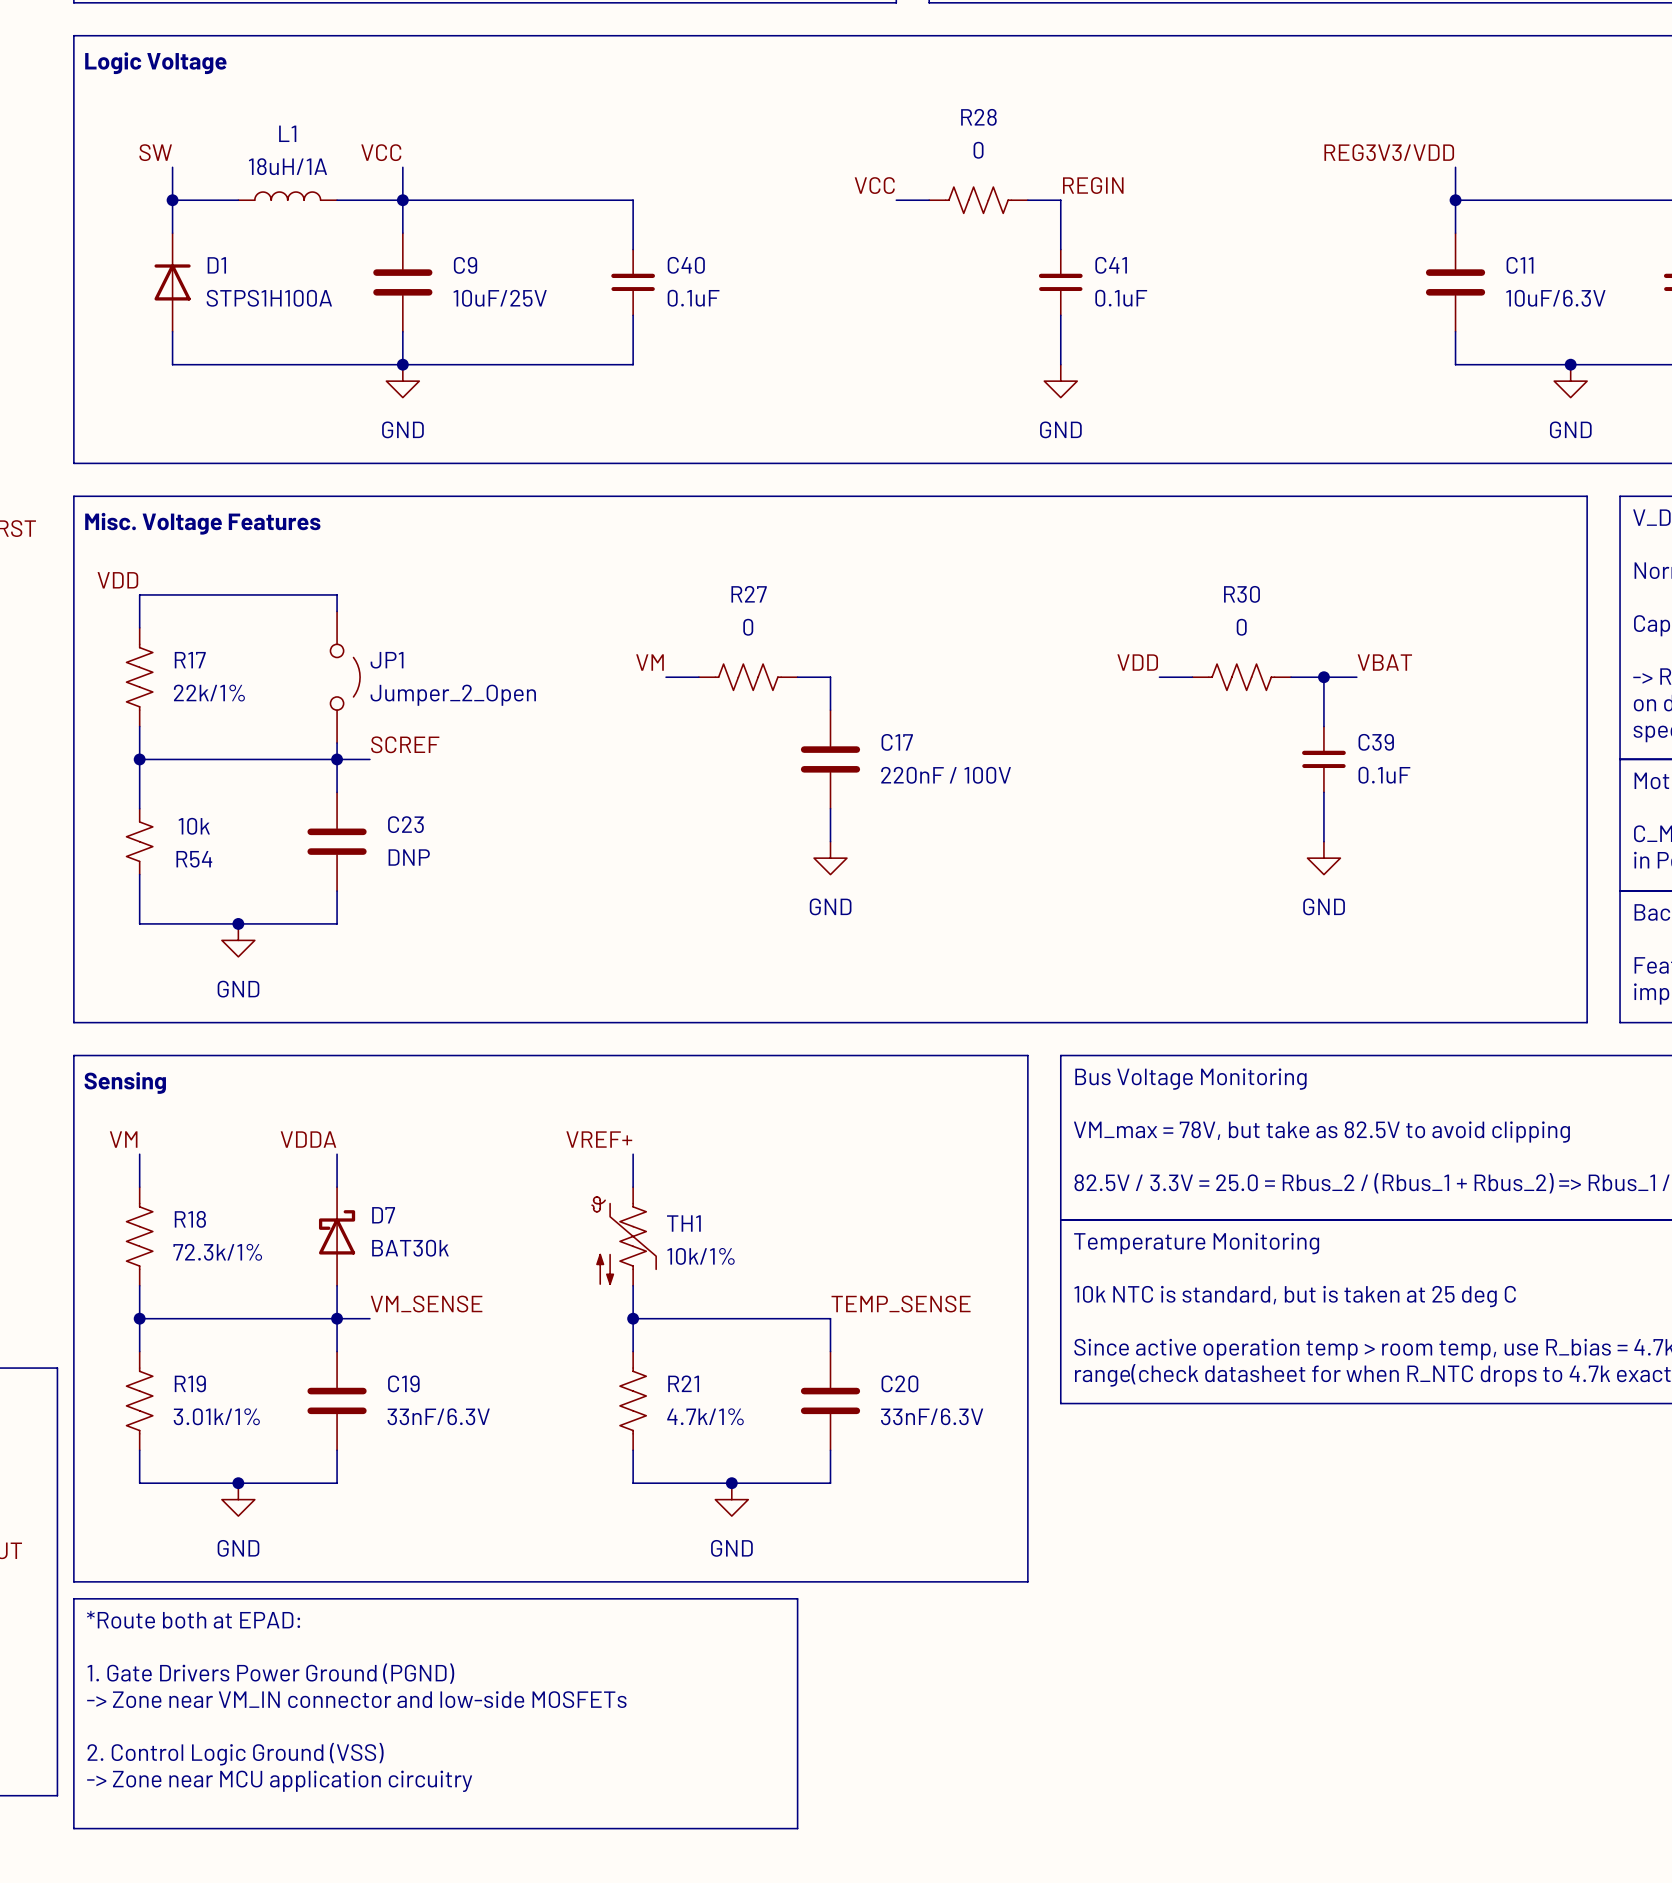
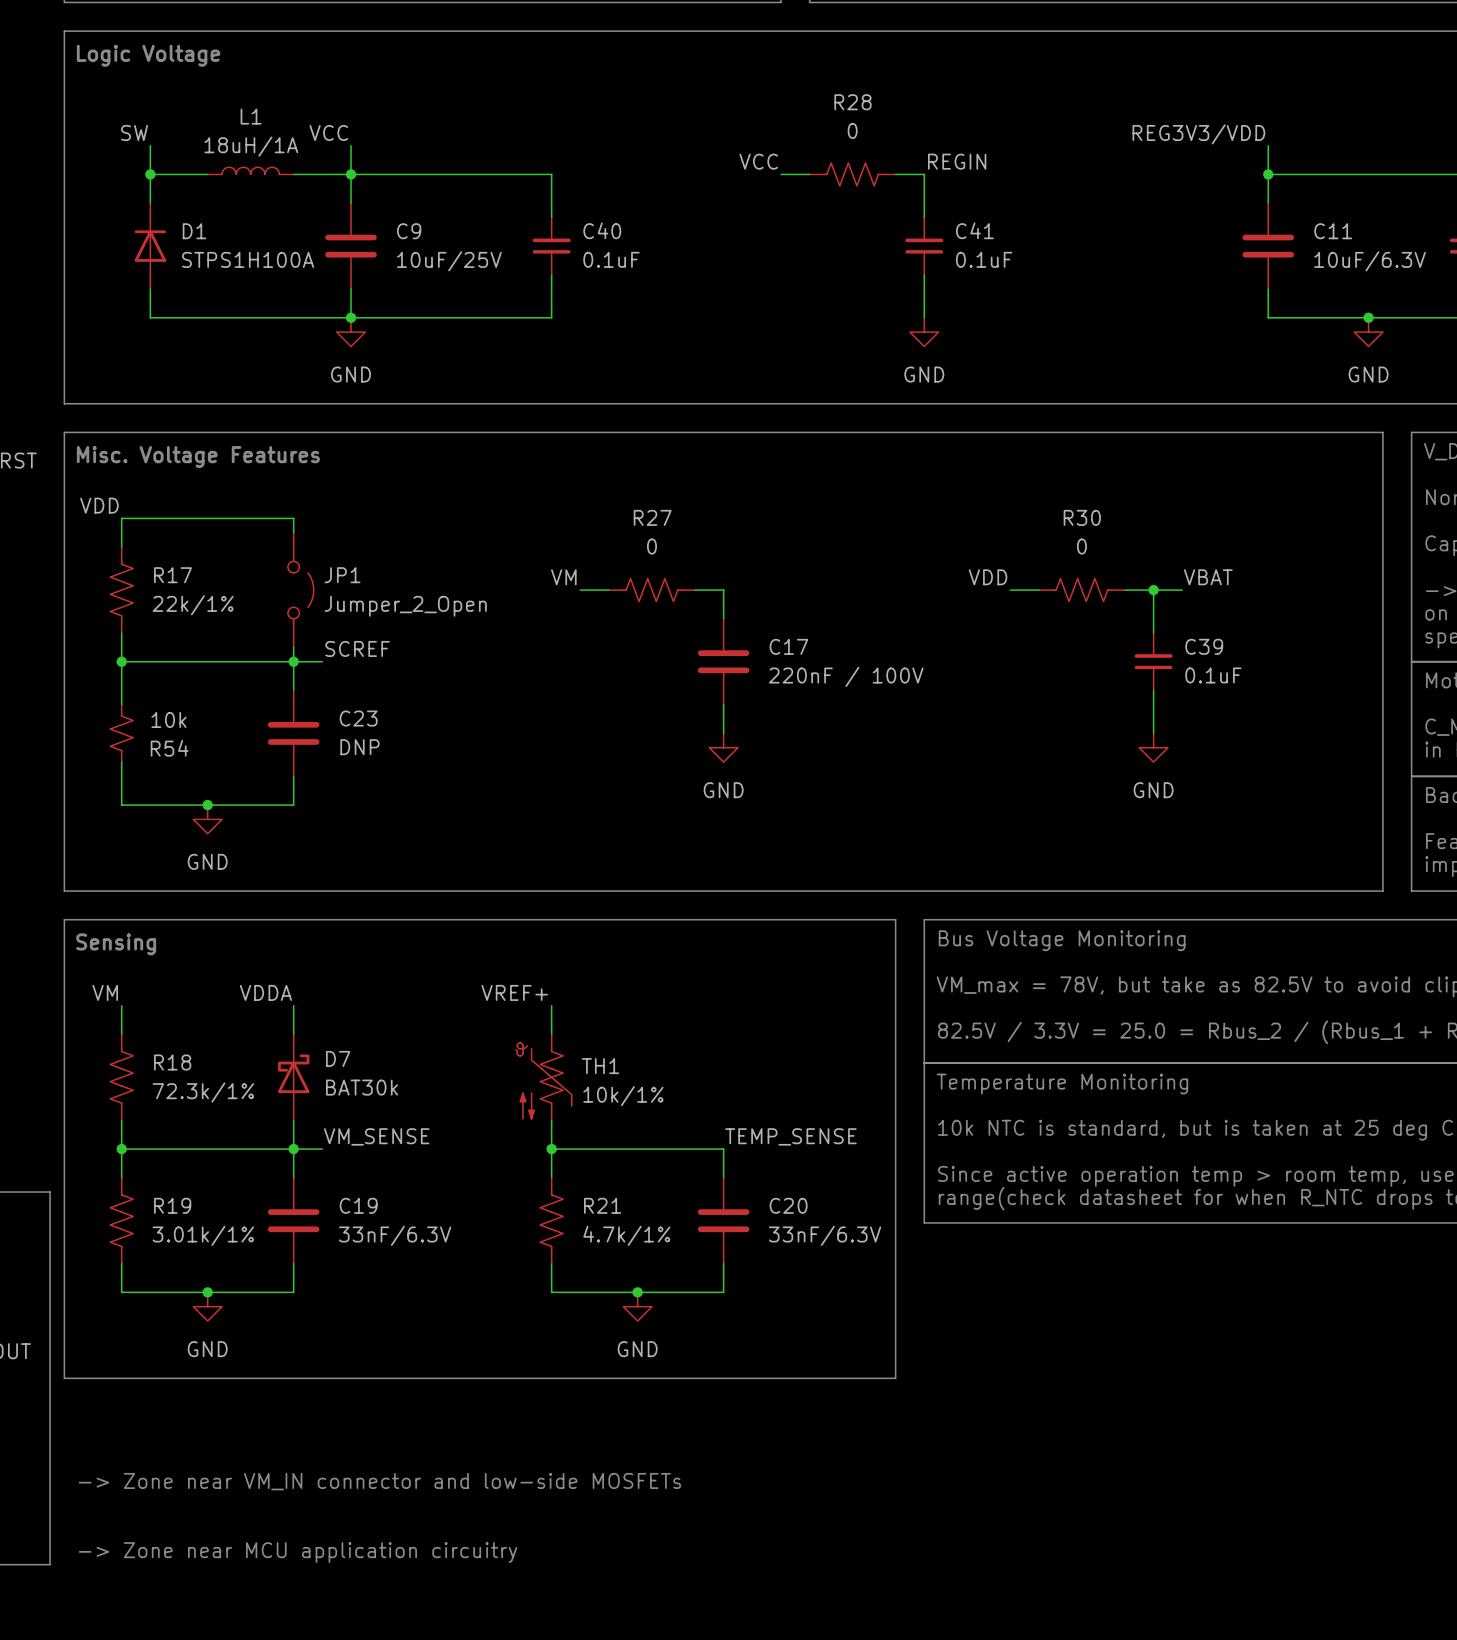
line: (73, 1598) (73, 1828) (797, 1828) (797, 1598) (73, 1598) -> none
text: *Route both at EPAD: (193, 1619) -> none
text: 1. Gate Drivers Power Ground (PGND) (270, 1673) -> none
text: 2. Control Logic Ground (VSS) (235, 1754) -> none

